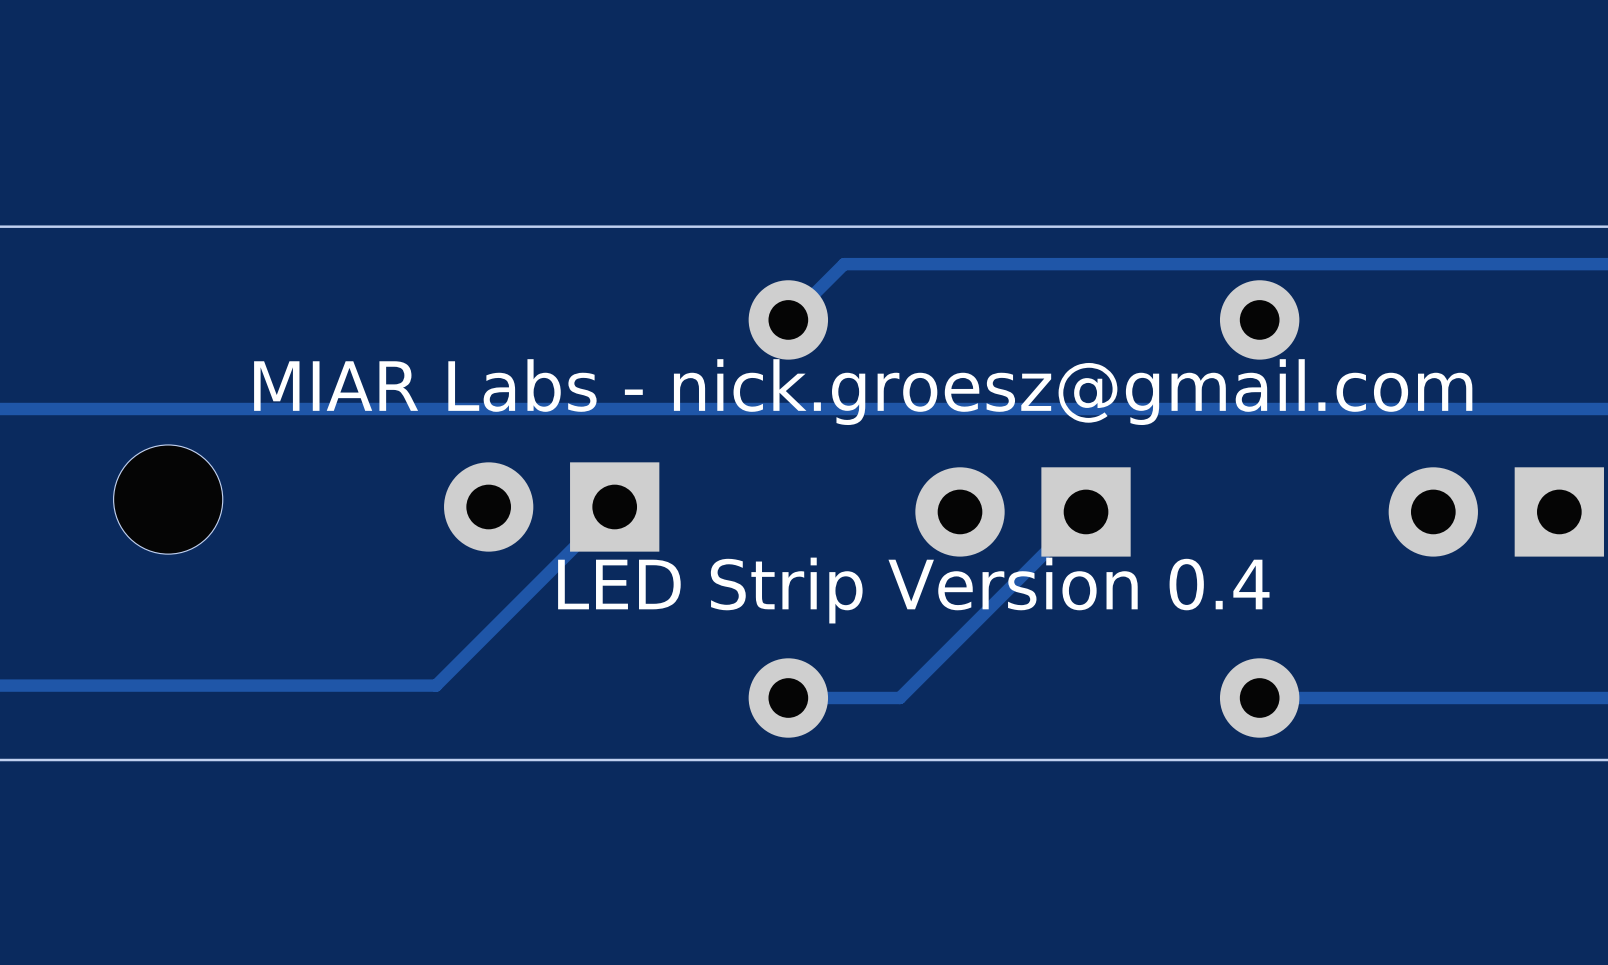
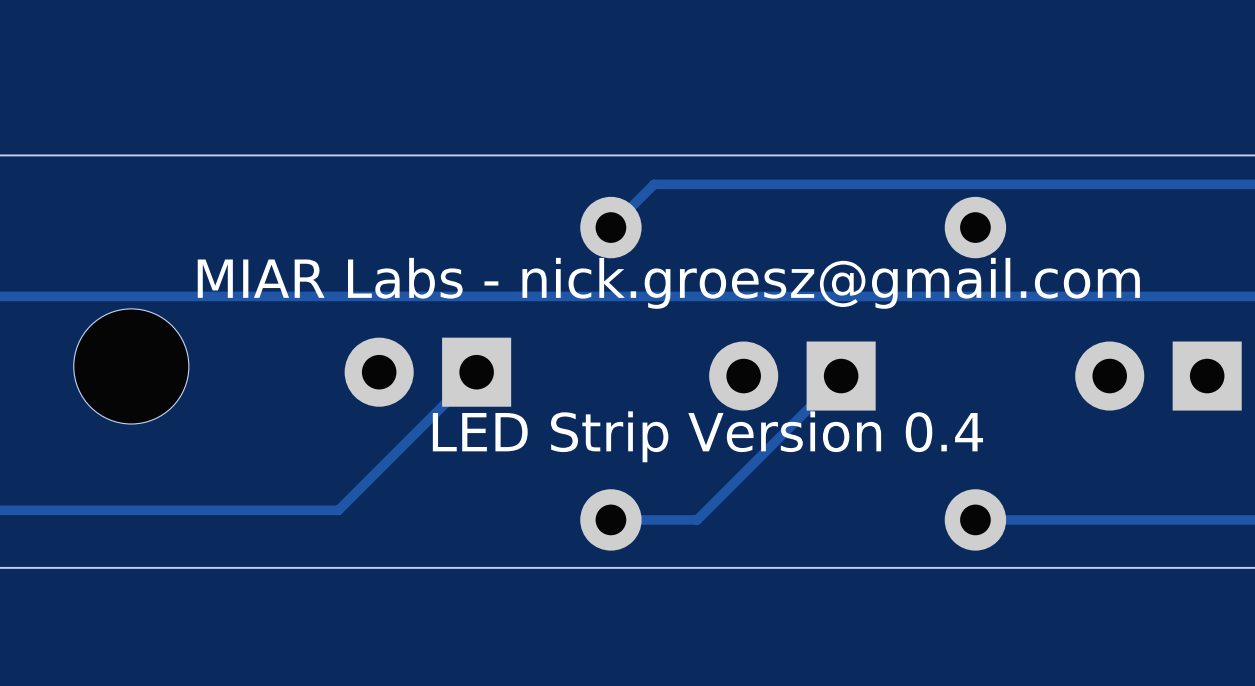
part footprint: [113, 444, 223, 555] -> [73, 308, 189, 425]

